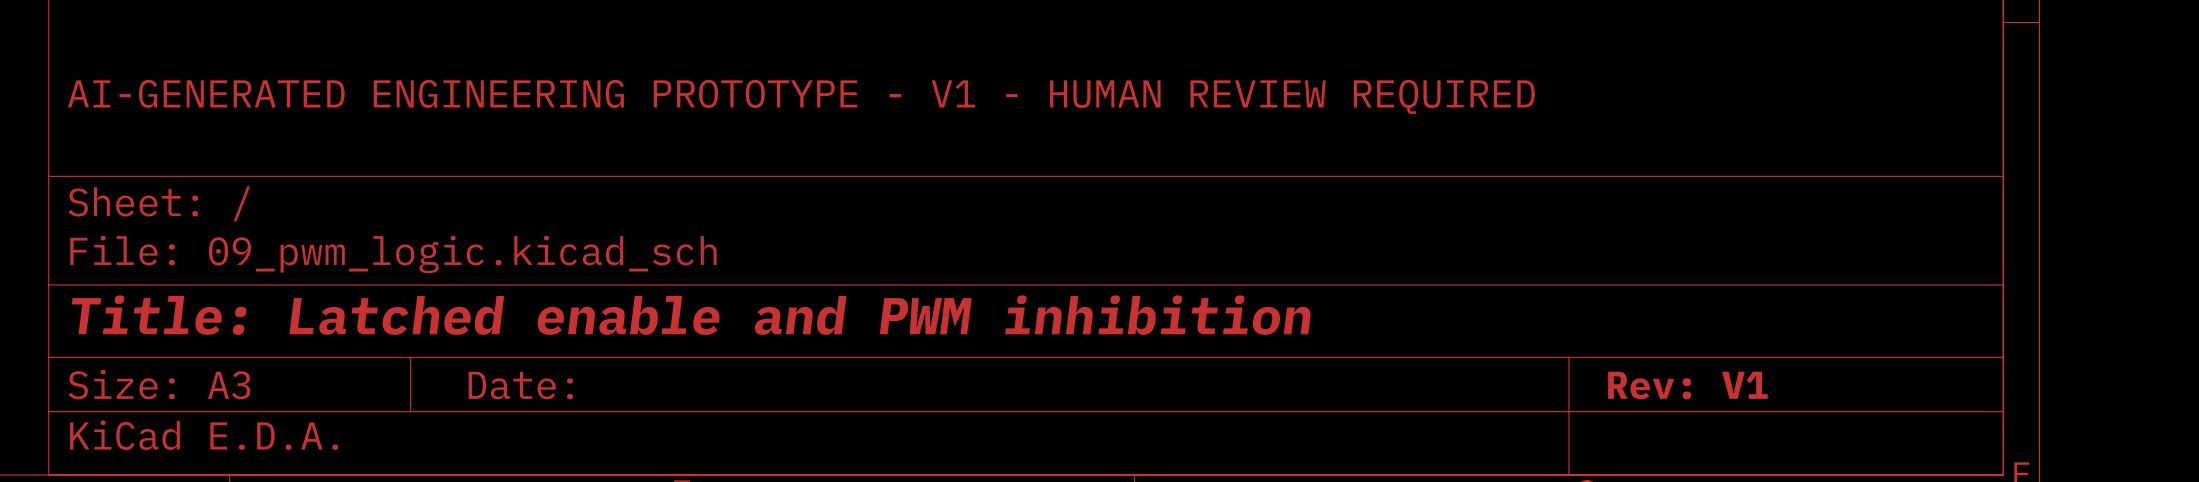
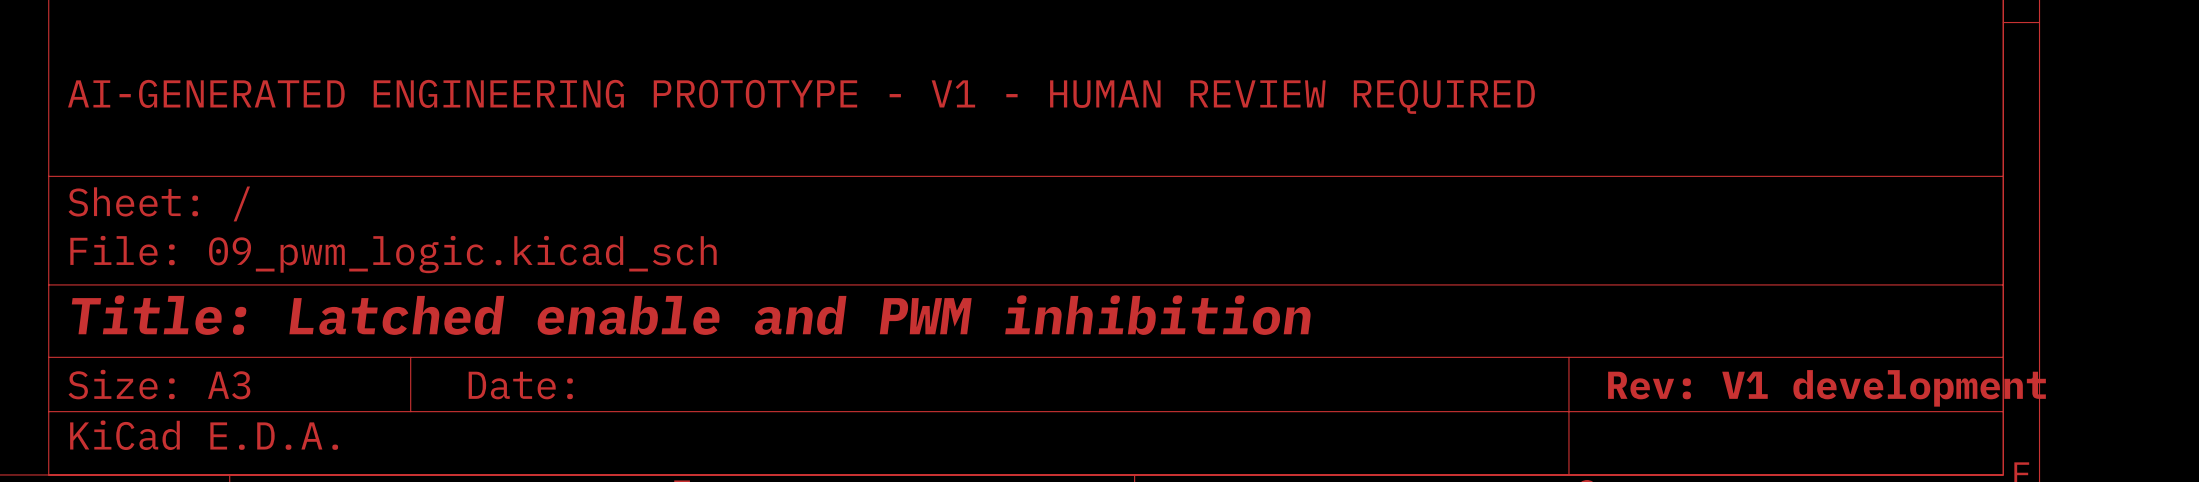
title block: Rev: V1 (1687, 385) -> Rev: V1 development (1826, 388)

